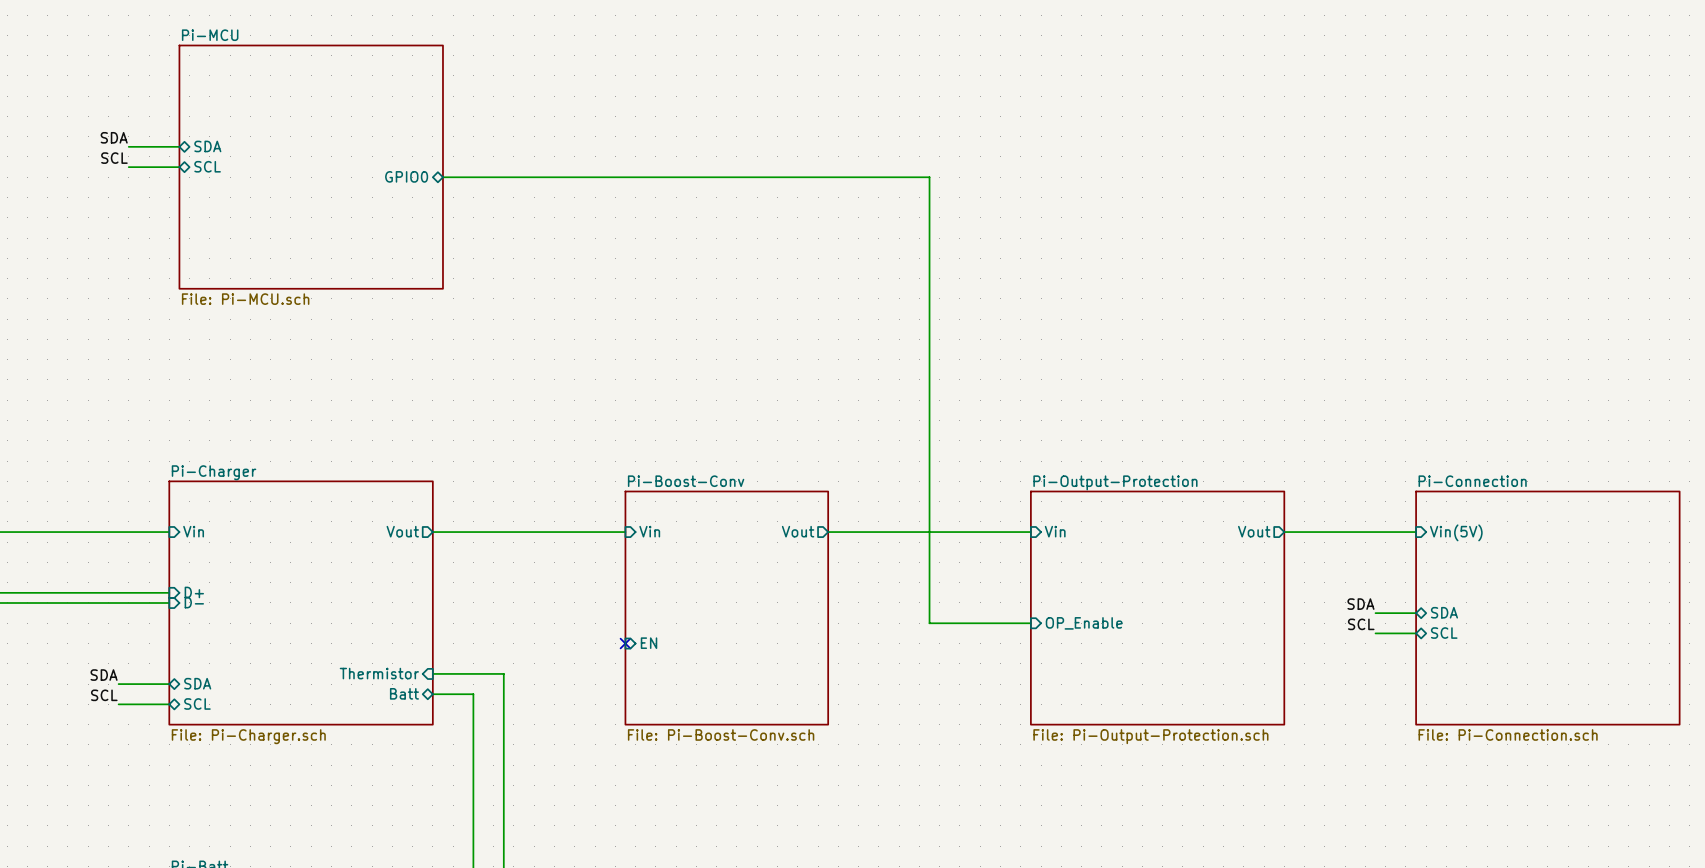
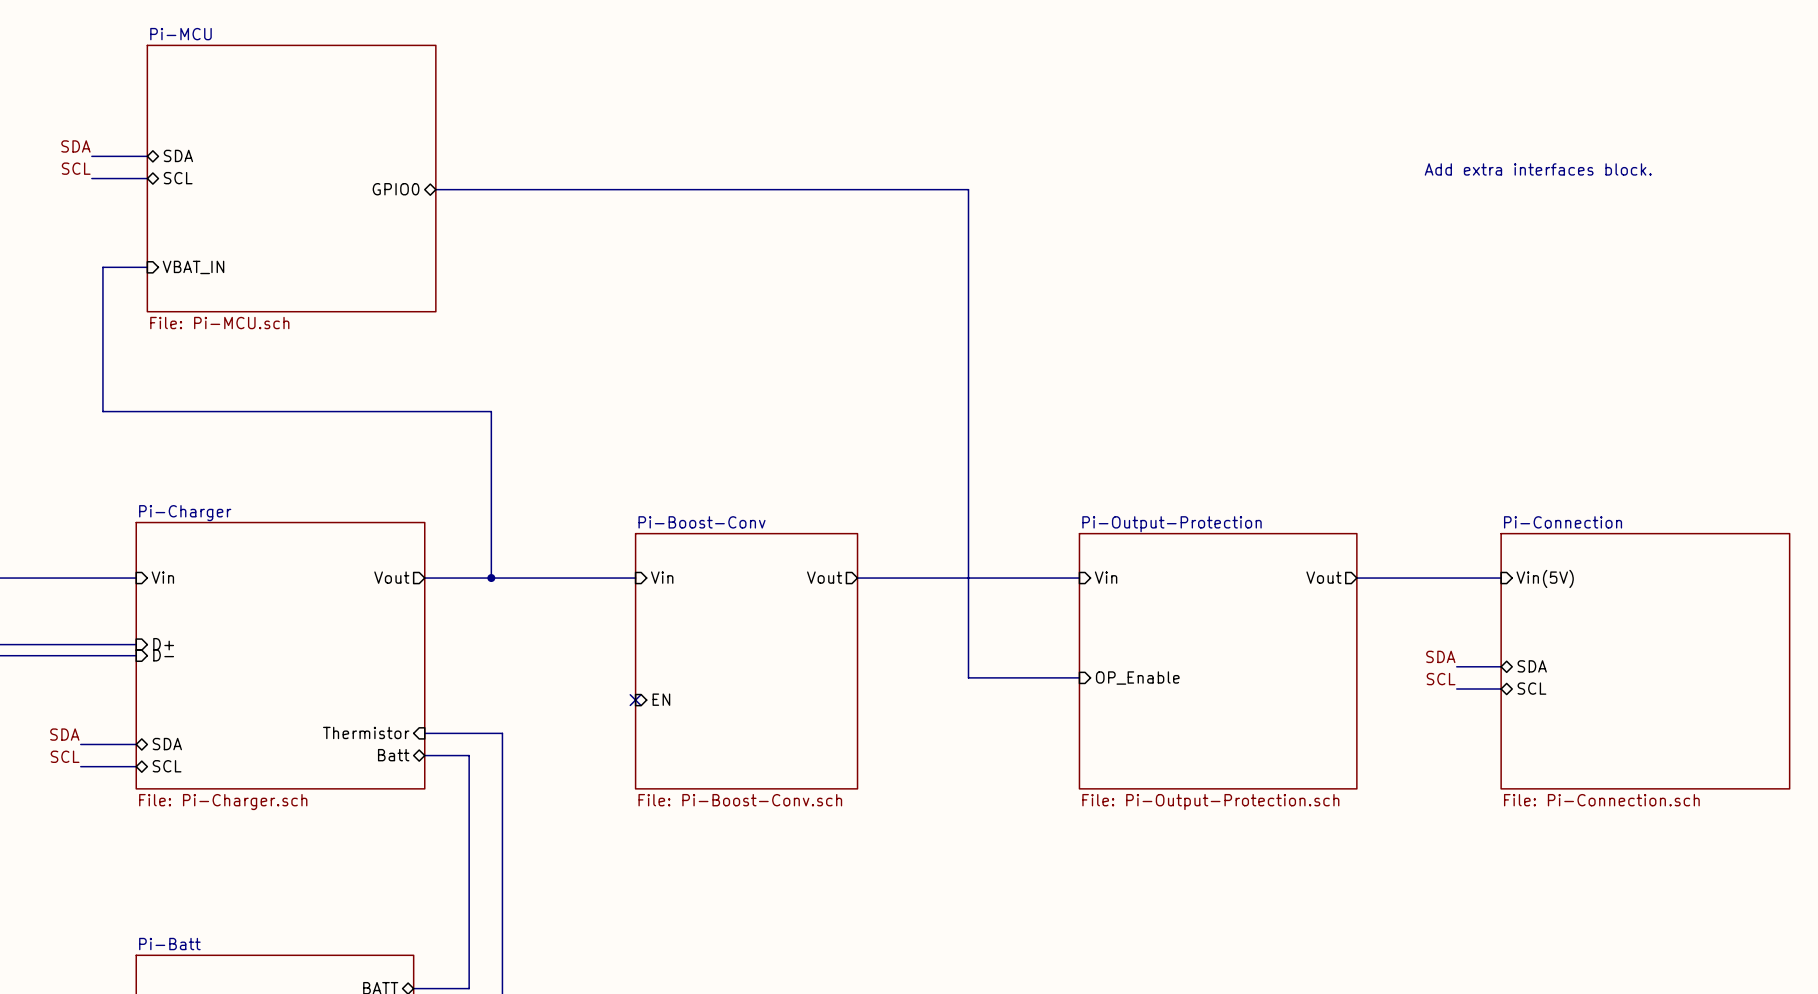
text: none -> Add extra interfaces block. (1538, 169)
wire: none -> (147, 267) (102, 267) (102, 411) (491, 411) (491, 578)
sheet pin: none -> VBAT_IN (193, 267)
junction: none -> (491, 578)

